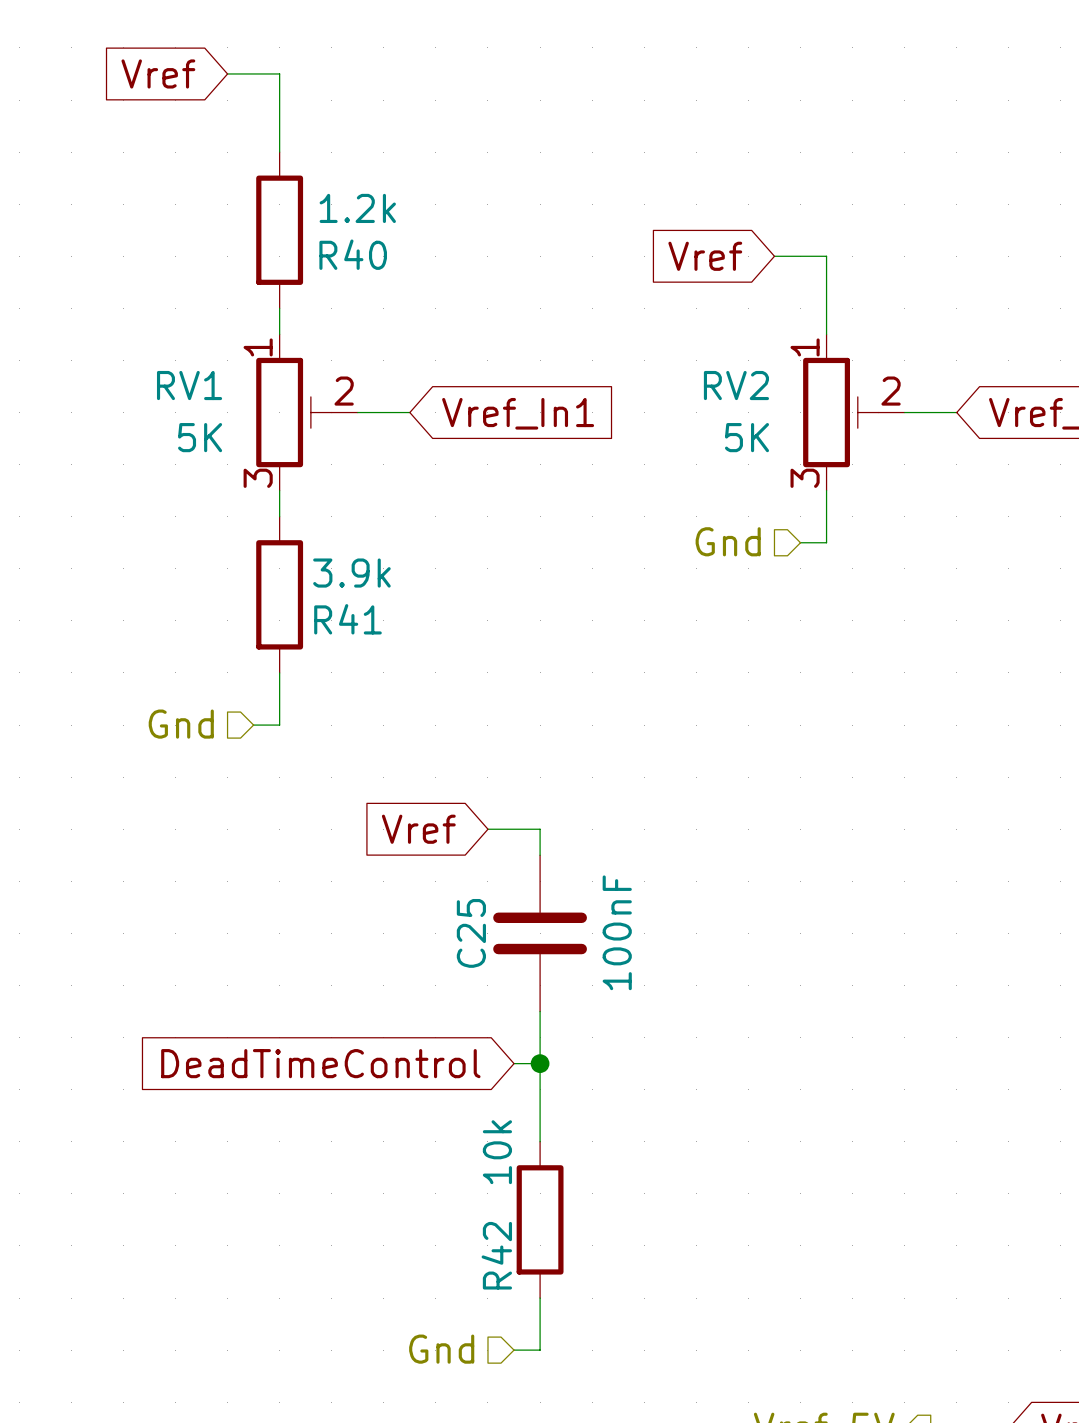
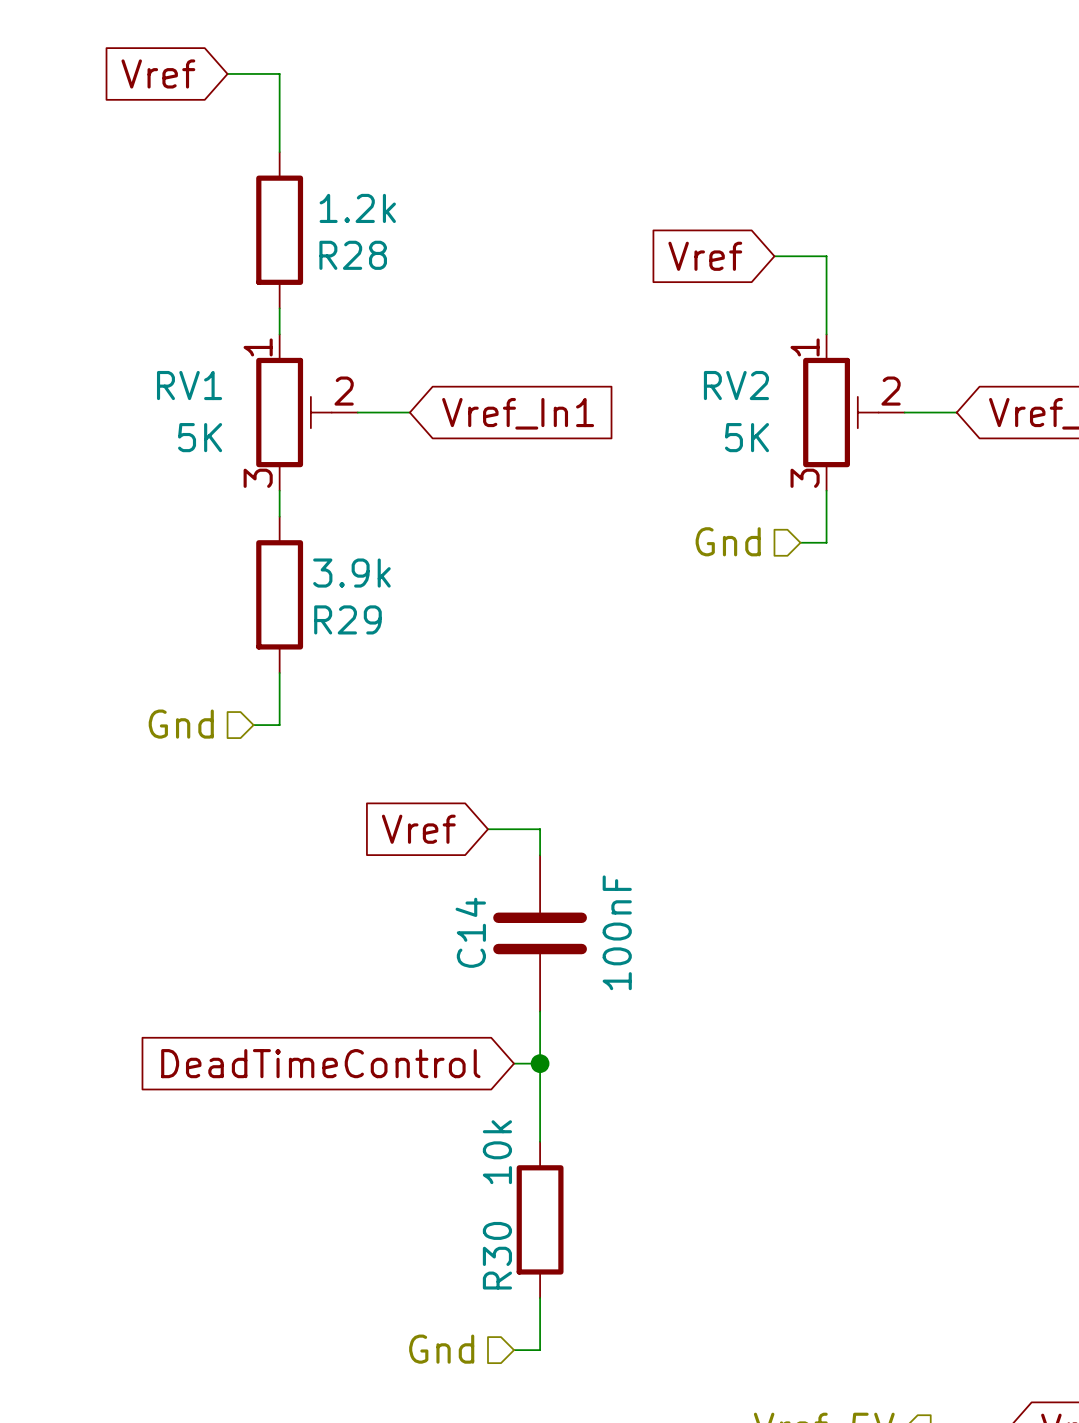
R40 name: R40 (353, 254) -> R28 (353, 255)
R41 name: R41 (347, 619) -> R29 (347, 619)
C25 name: C25 (471, 933) -> C14 (470, 932)
R42 name: R42 (496, 1255) -> R30 (497, 1255)

